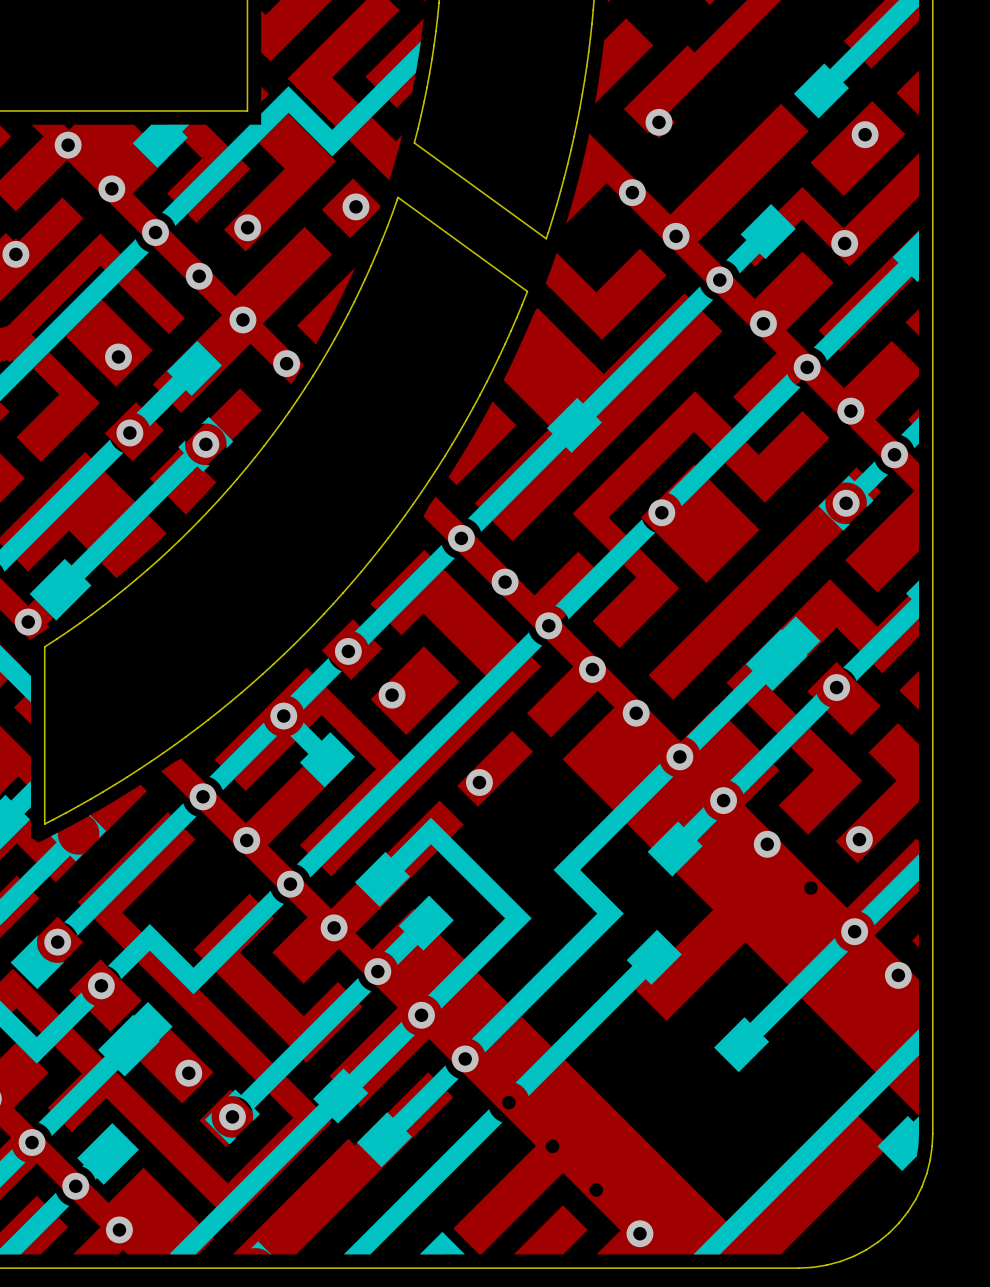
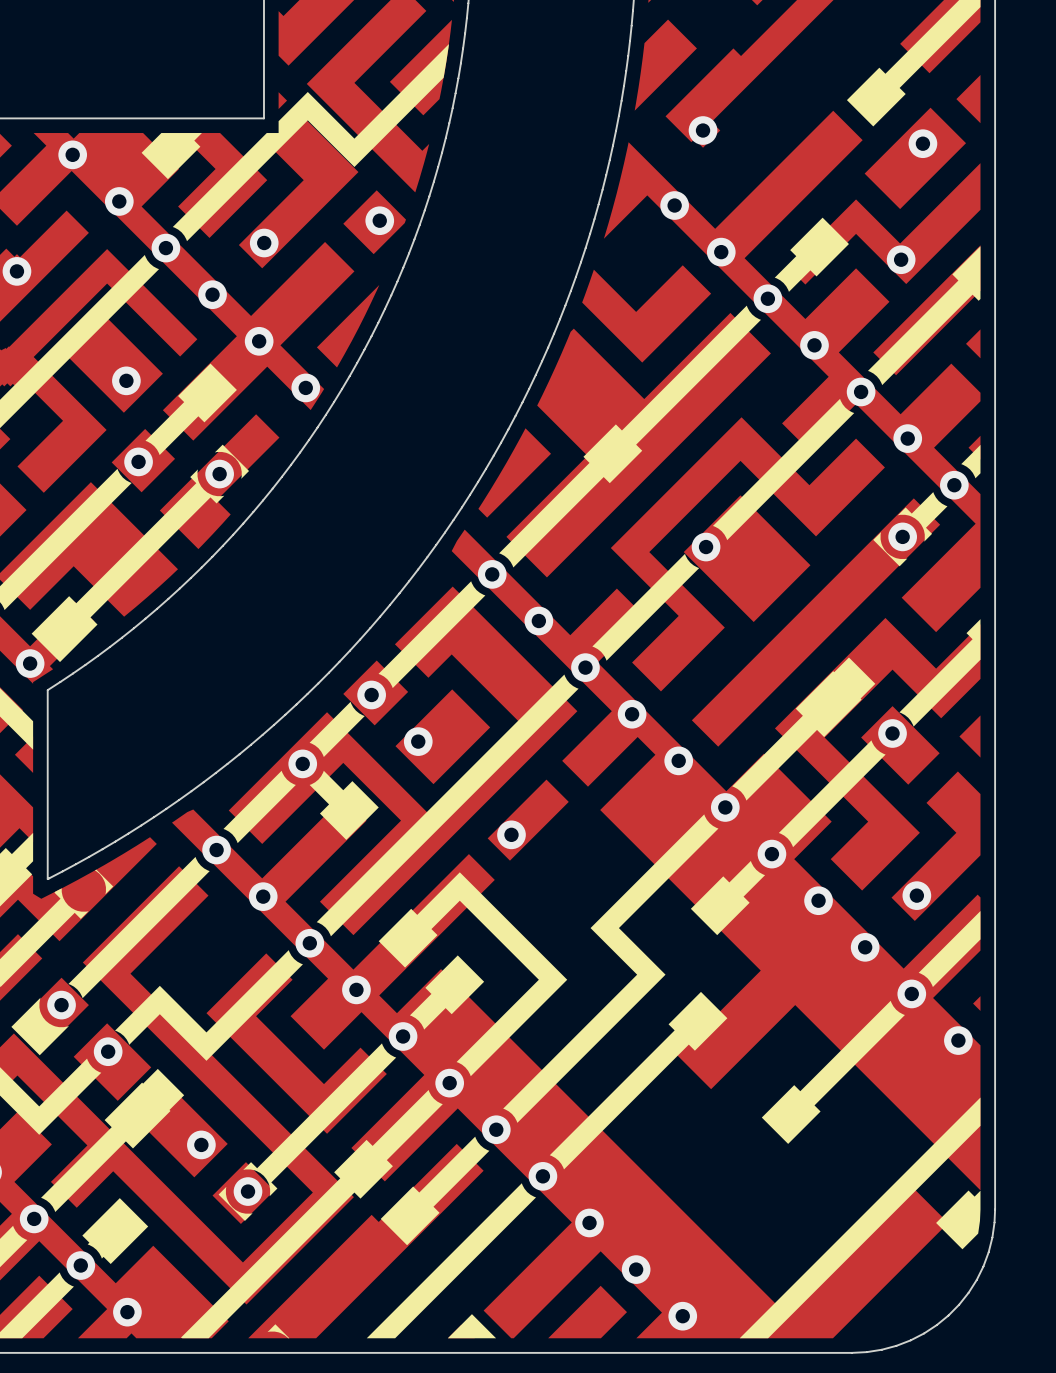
board edge: (593, 9) (586, 66) (577, 122) (564, 177) (546, 238) (414, 142) (417, 129) -> (633, 10) (626, 70) (612, 145) (594, 219) (575, 276) (554, 333) (522, 402) (493, 455) (453, 520) (418, 569) (370, 628) (329, 672) (274, 724) (227, 763) (166, 808) (115, 841) (47, 879)
drawing shape: [423, 496, 920, 1116] -> [451, 529, 981, 1191]
board edge: (56, 639) (114, 597) (168, 550) (218, 499) (264, 446) (305, 388) (341, 326) (371, 265) (398, 197) (527, 291) (486, 382) (444, 456) (388, 538) (333, 603) (273, 664) (197, 728) (127, 777) (44, 824) -> (60, 681) (133, 628) (201, 567) (263, 500) (308, 440) (349, 376) (391, 295) (419, 224) (445, 137)
drawing shape: [161, 747, 889, 1255] -> [172, 797, 949, 1339]
via: none -> (865, 947)
via: none -> (542, 1176)
via: none -> (589, 1222)
via: none -> (636, 1269)

